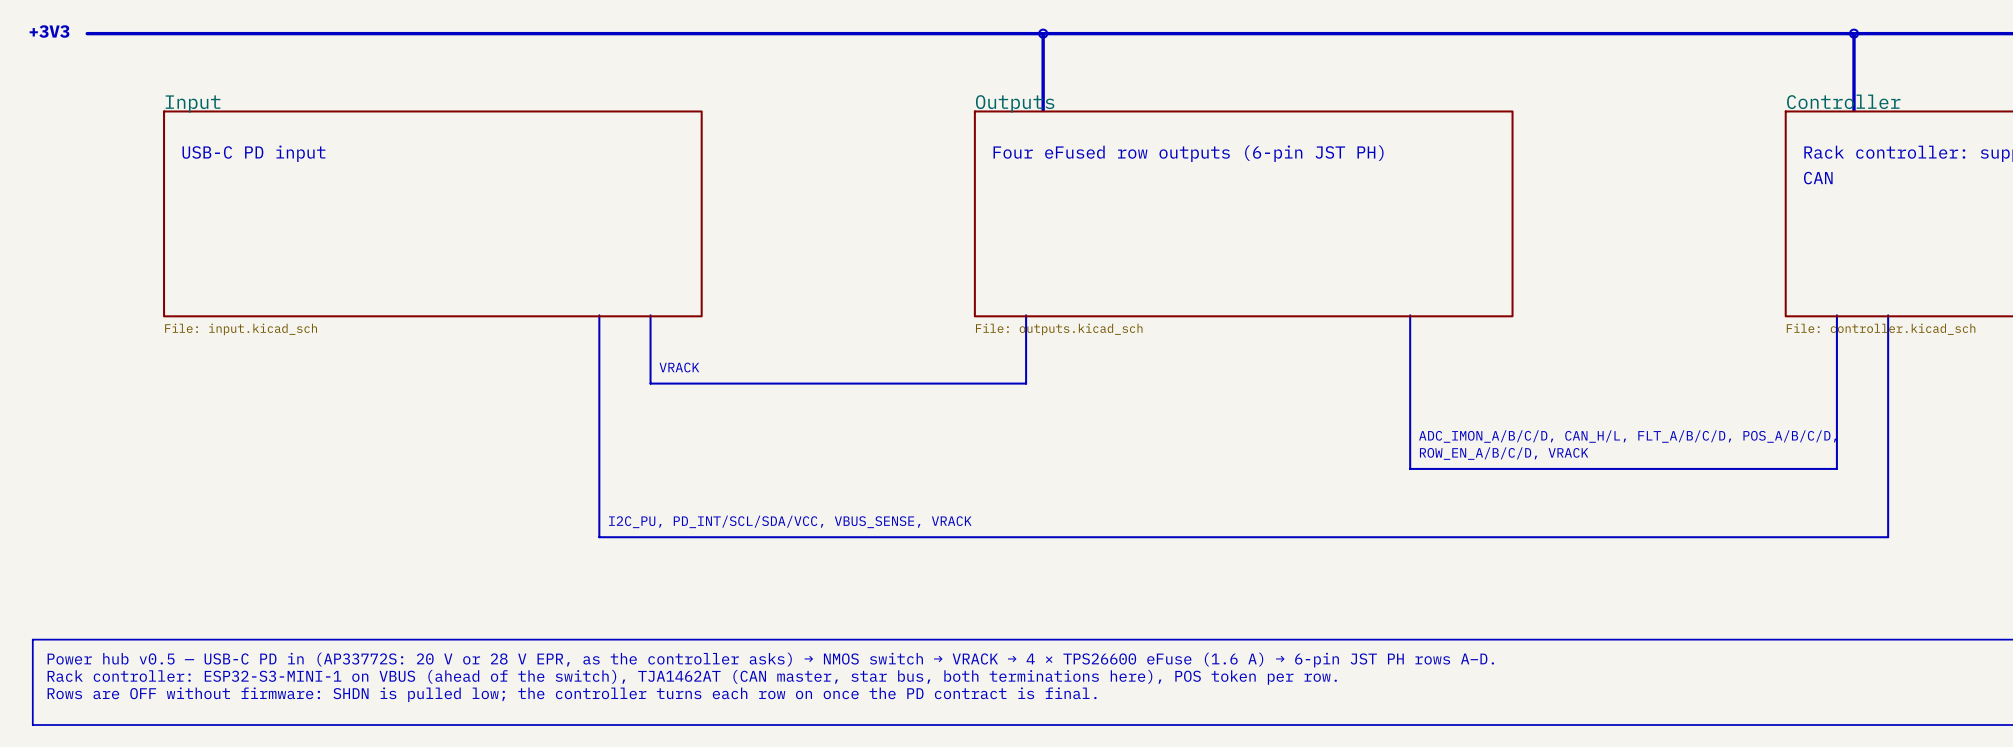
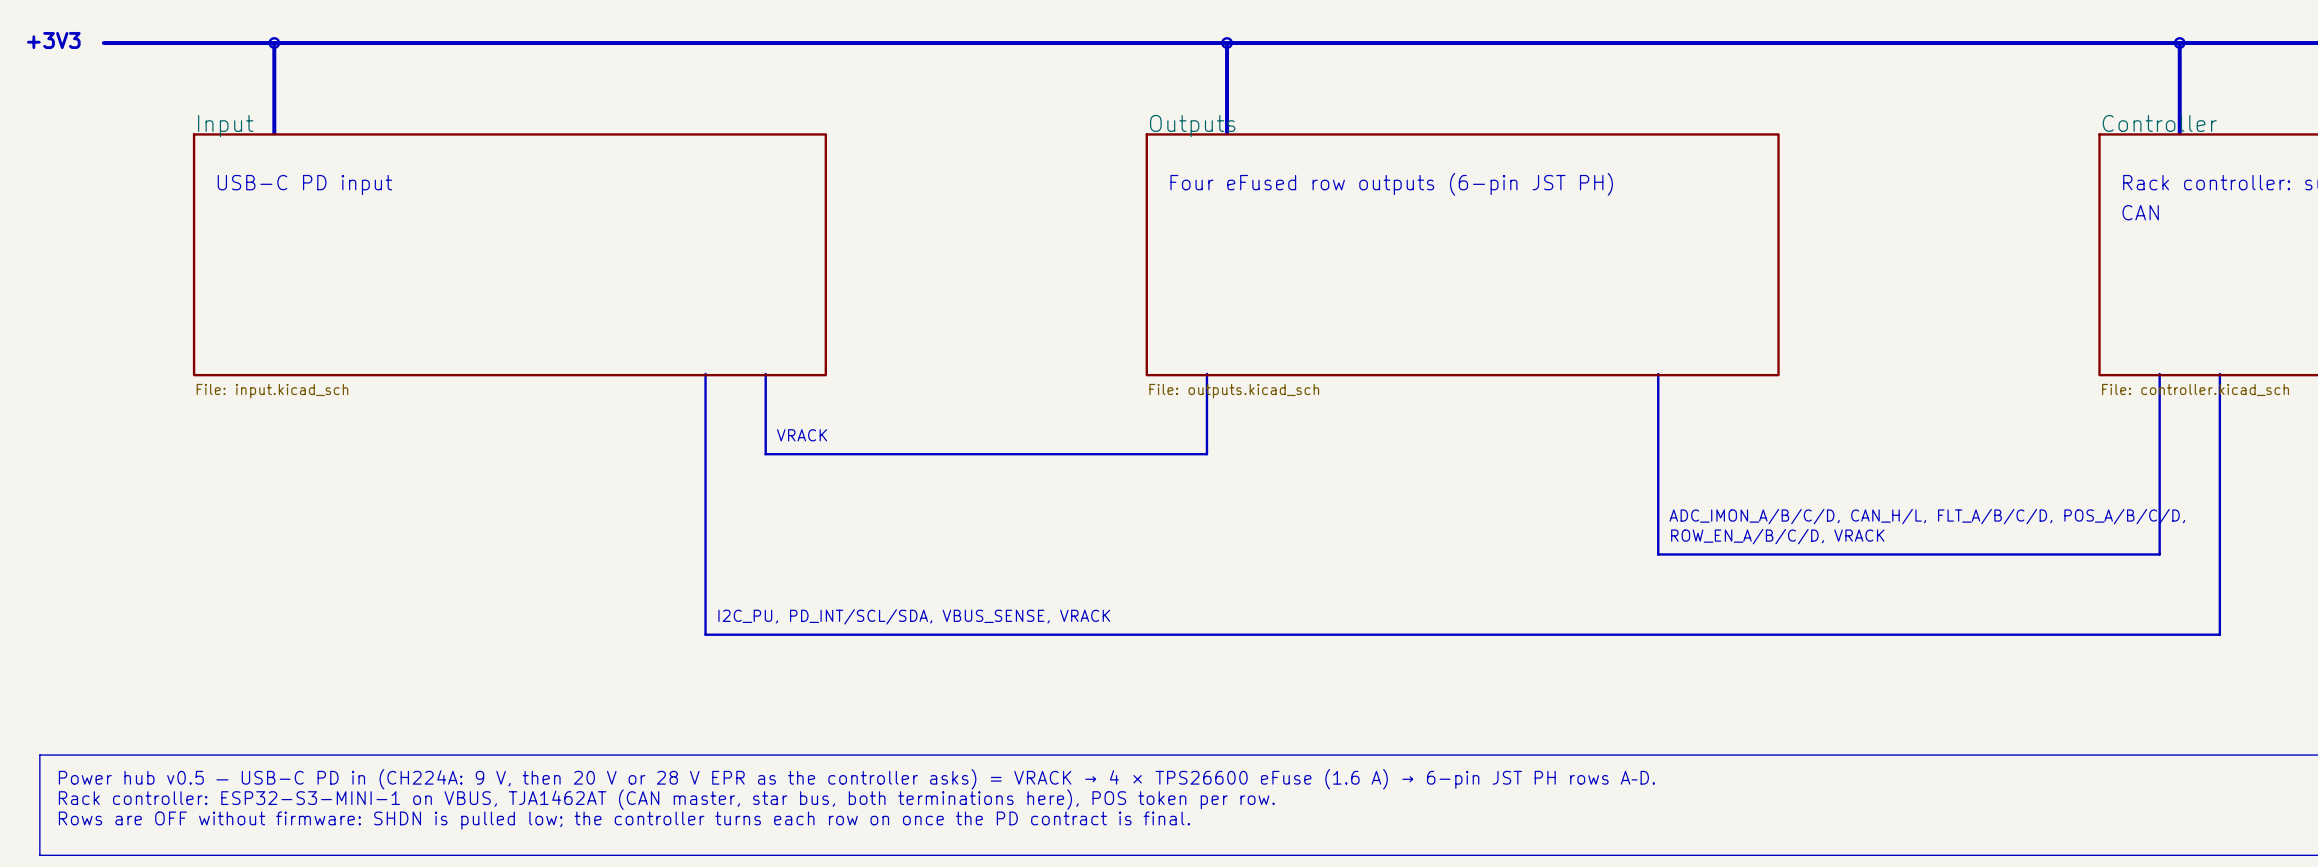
drawing: none -> [268, 37, 281, 49]
line: none -> (274, 43) (274, 133)
text: I2C_PU, PD_INT/SCL/SDA/VCC, VBUS_SENSE, VRACK (790, 521) -> I2C_PU, PD_INT/SCL/SDA, VBUS_SENSE, VRACK (914, 616)
text: Power hub v0.5 — USB-C PD in (AP33772S: 20 V or 28 V EPR, as the controller asks) → NMOS switch → VRACK → 4 × TPS26600 eFuse (1.6 A) → 6-pin JST PH rows A–D. (770, 660) -> Power hub v0.5 — USB-C PD in (CH224A: 9 V, then 20 V or 28 V EPR as the controller asks) = VRACK → 4 × TPS26600 eFuse (1.6 A) → 6-pin JST PH rows A–D. (856, 779)
text: Rack controller: ESP32-S3-MINI-1 on VBUS (ahead of the switch), TJA1462AT (CAN master, star bus, both terminations here), POS token per row. (692, 677) -> Rack controller: ESP32-S3-MINI-1 on VBUS, TJA1462AT (CAN master, star bus, both terminations here), POS token per row. (666, 799)

